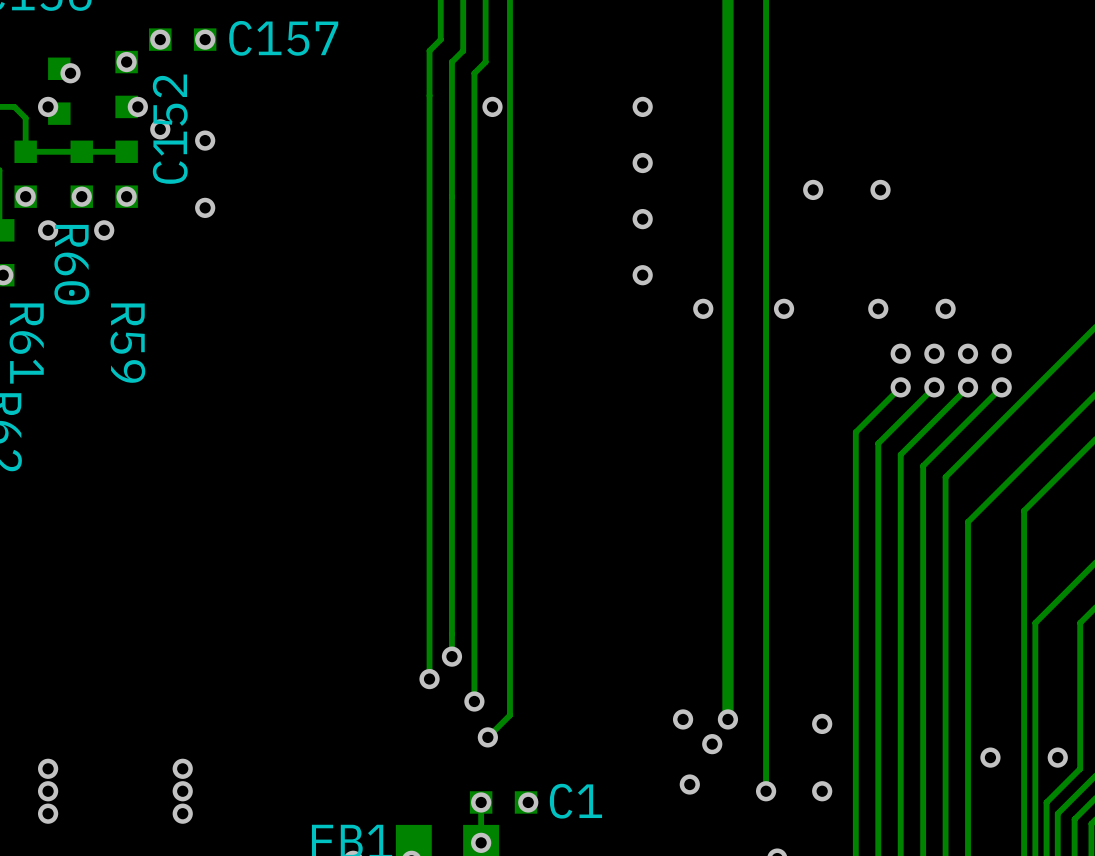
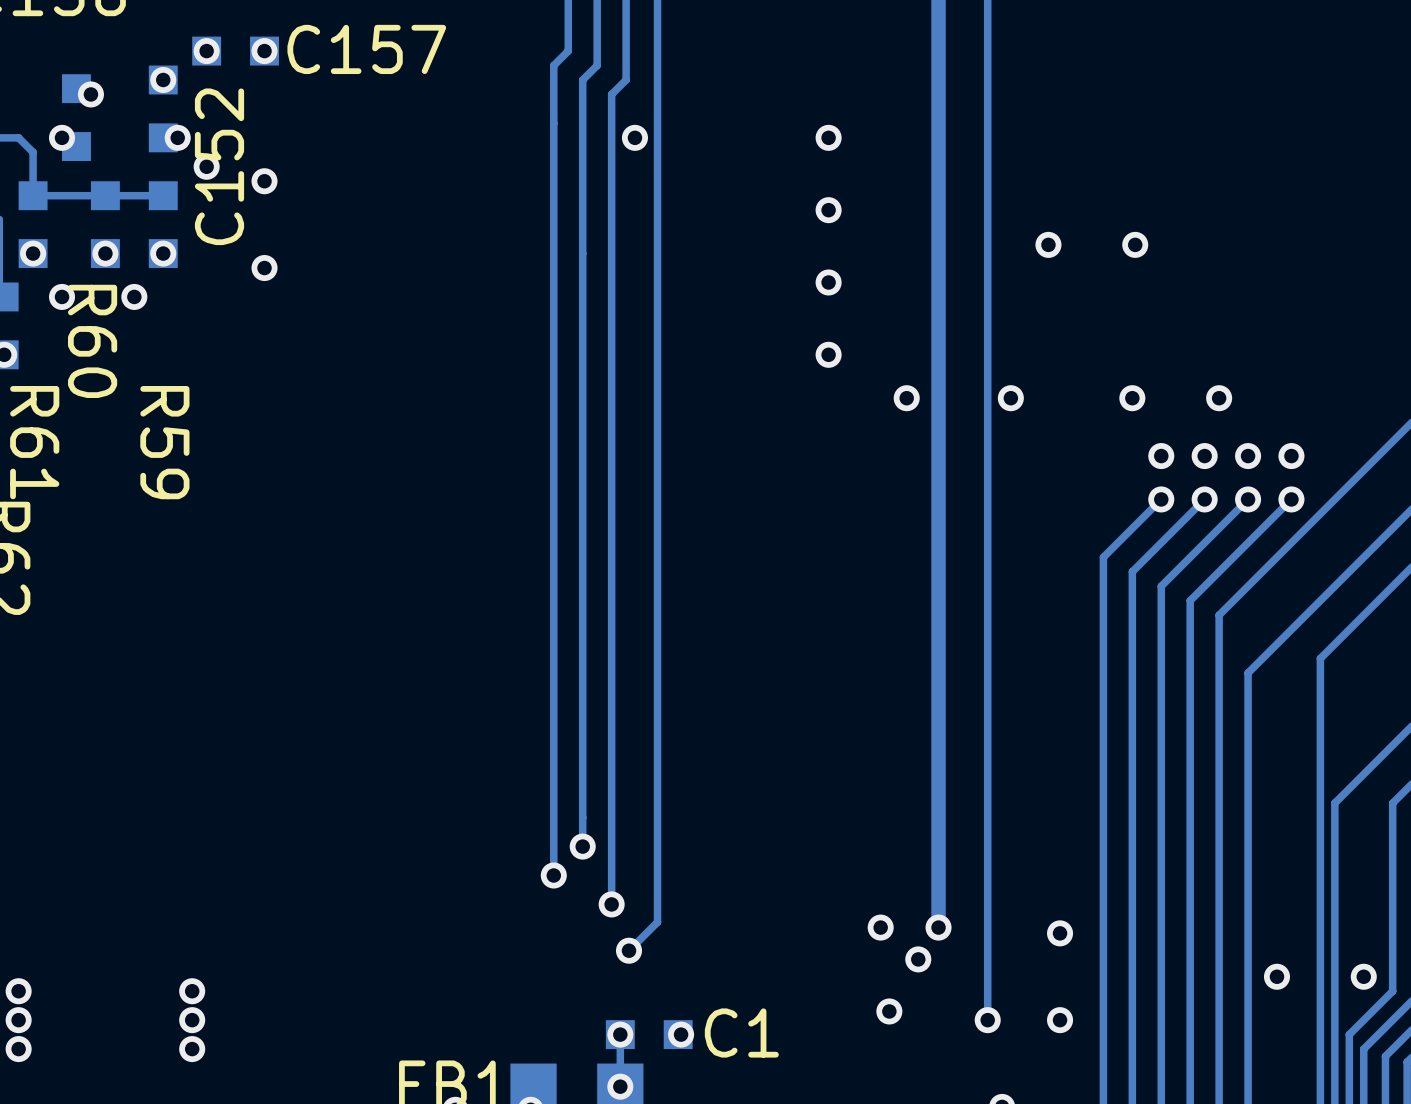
via: none -> (18, 991)
via: (48, 768) -> none
via: none -> (192, 991)
via: (182, 768) -> none
via: none -> (18, 1020)
via: (48, 791) -> none
via: none -> (192, 1020)
via: (182, 791) -> none
via: none -> (18, 1049)
via: (48, 813) -> none
via: none -> (192, 1049)
via: (182, 813) -> none

